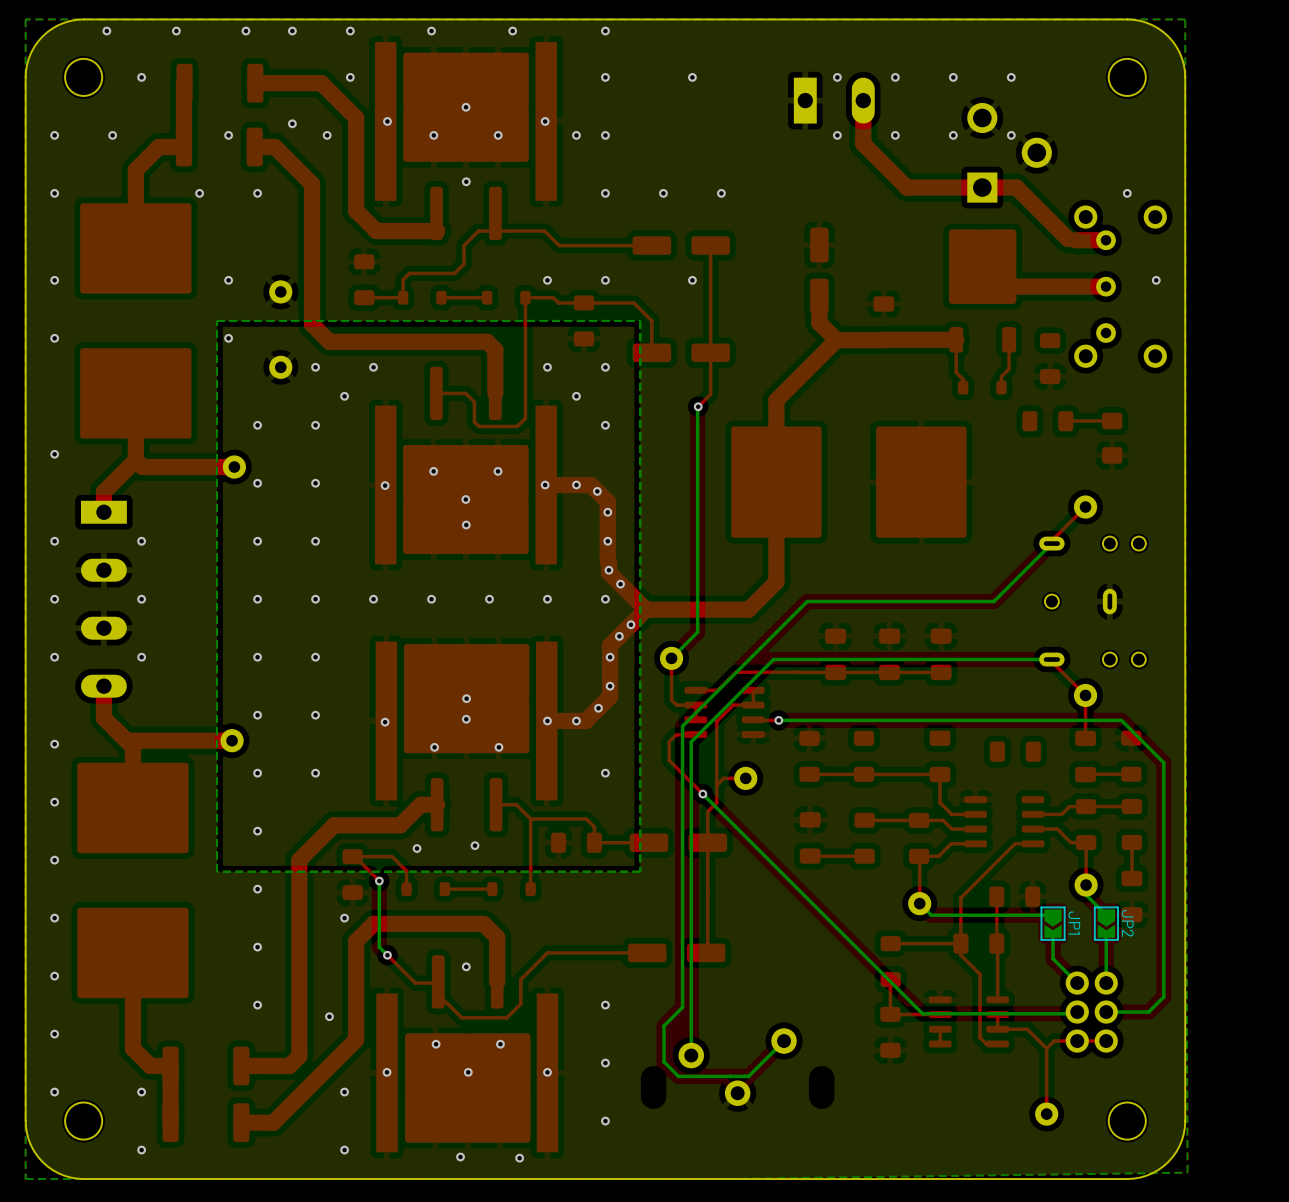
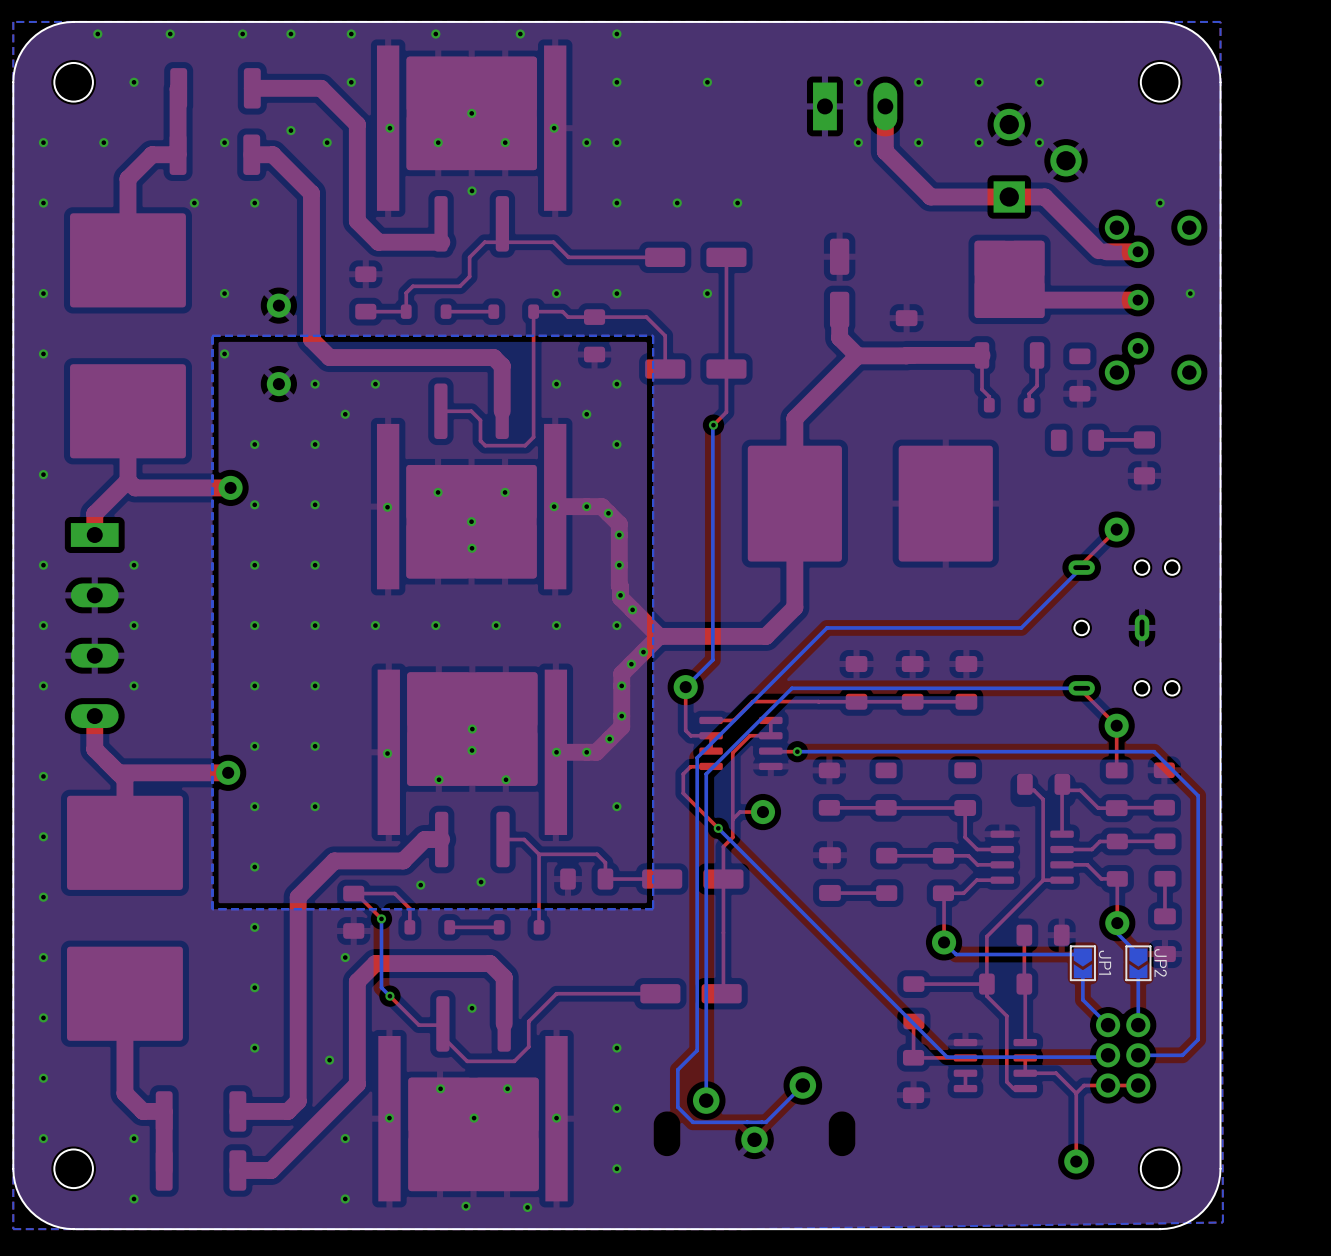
top track: none -> (1024, 790) (1033, 790) (1043, 799) (1043, 880)
top track: none -> (1116, 808) (1098, 808) (1080, 790) (1061, 790) (1062, 834)

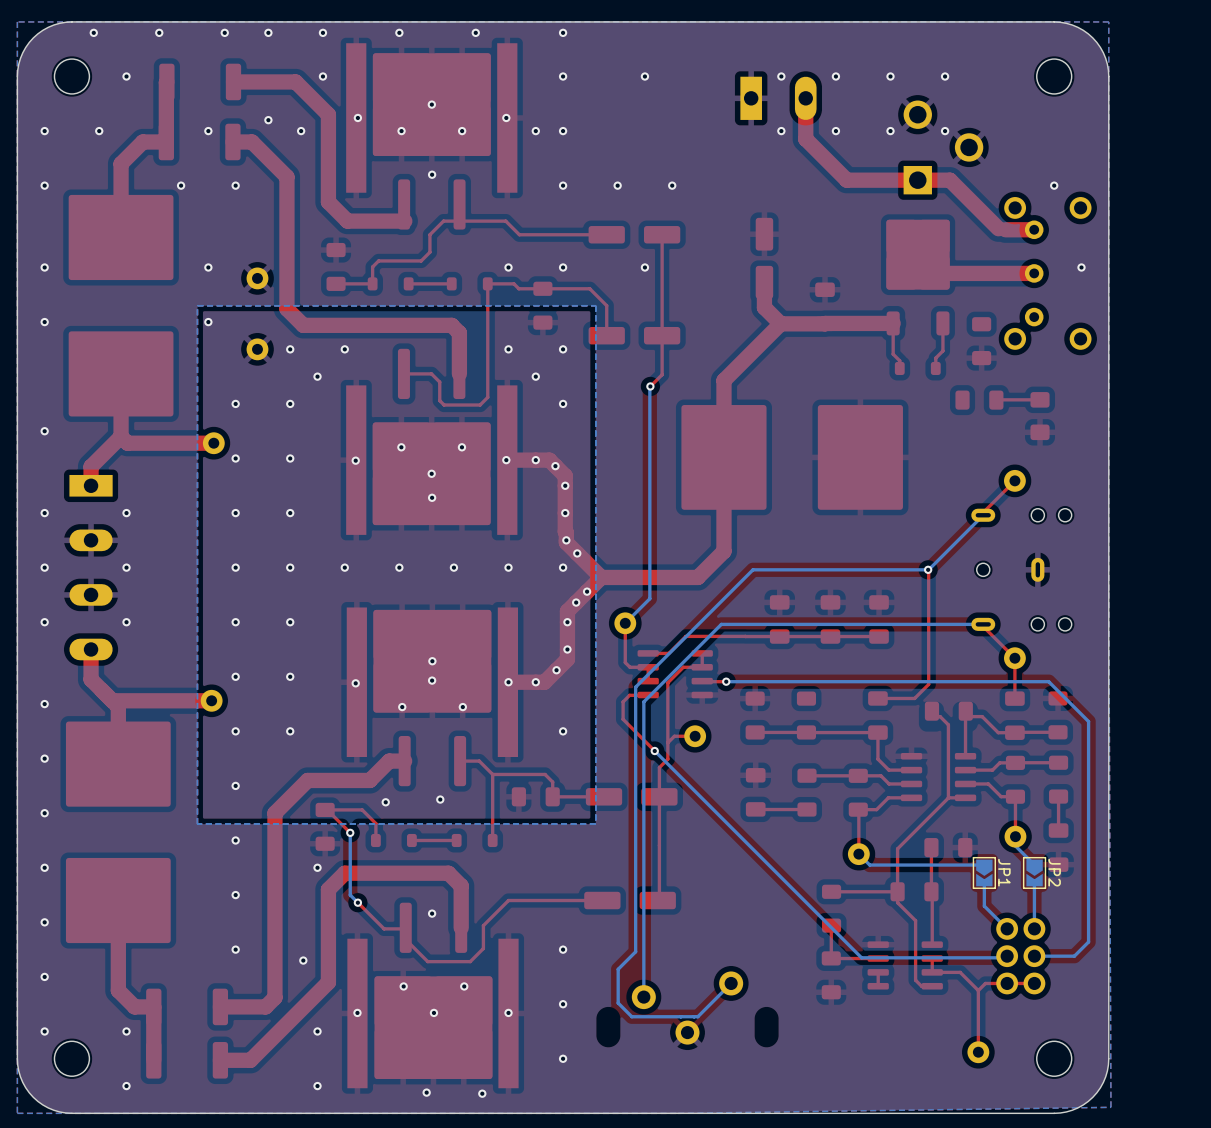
top track: none -> (928, 569) (928, 684) (914, 698) (877, 698)
via: none -> (928, 569)

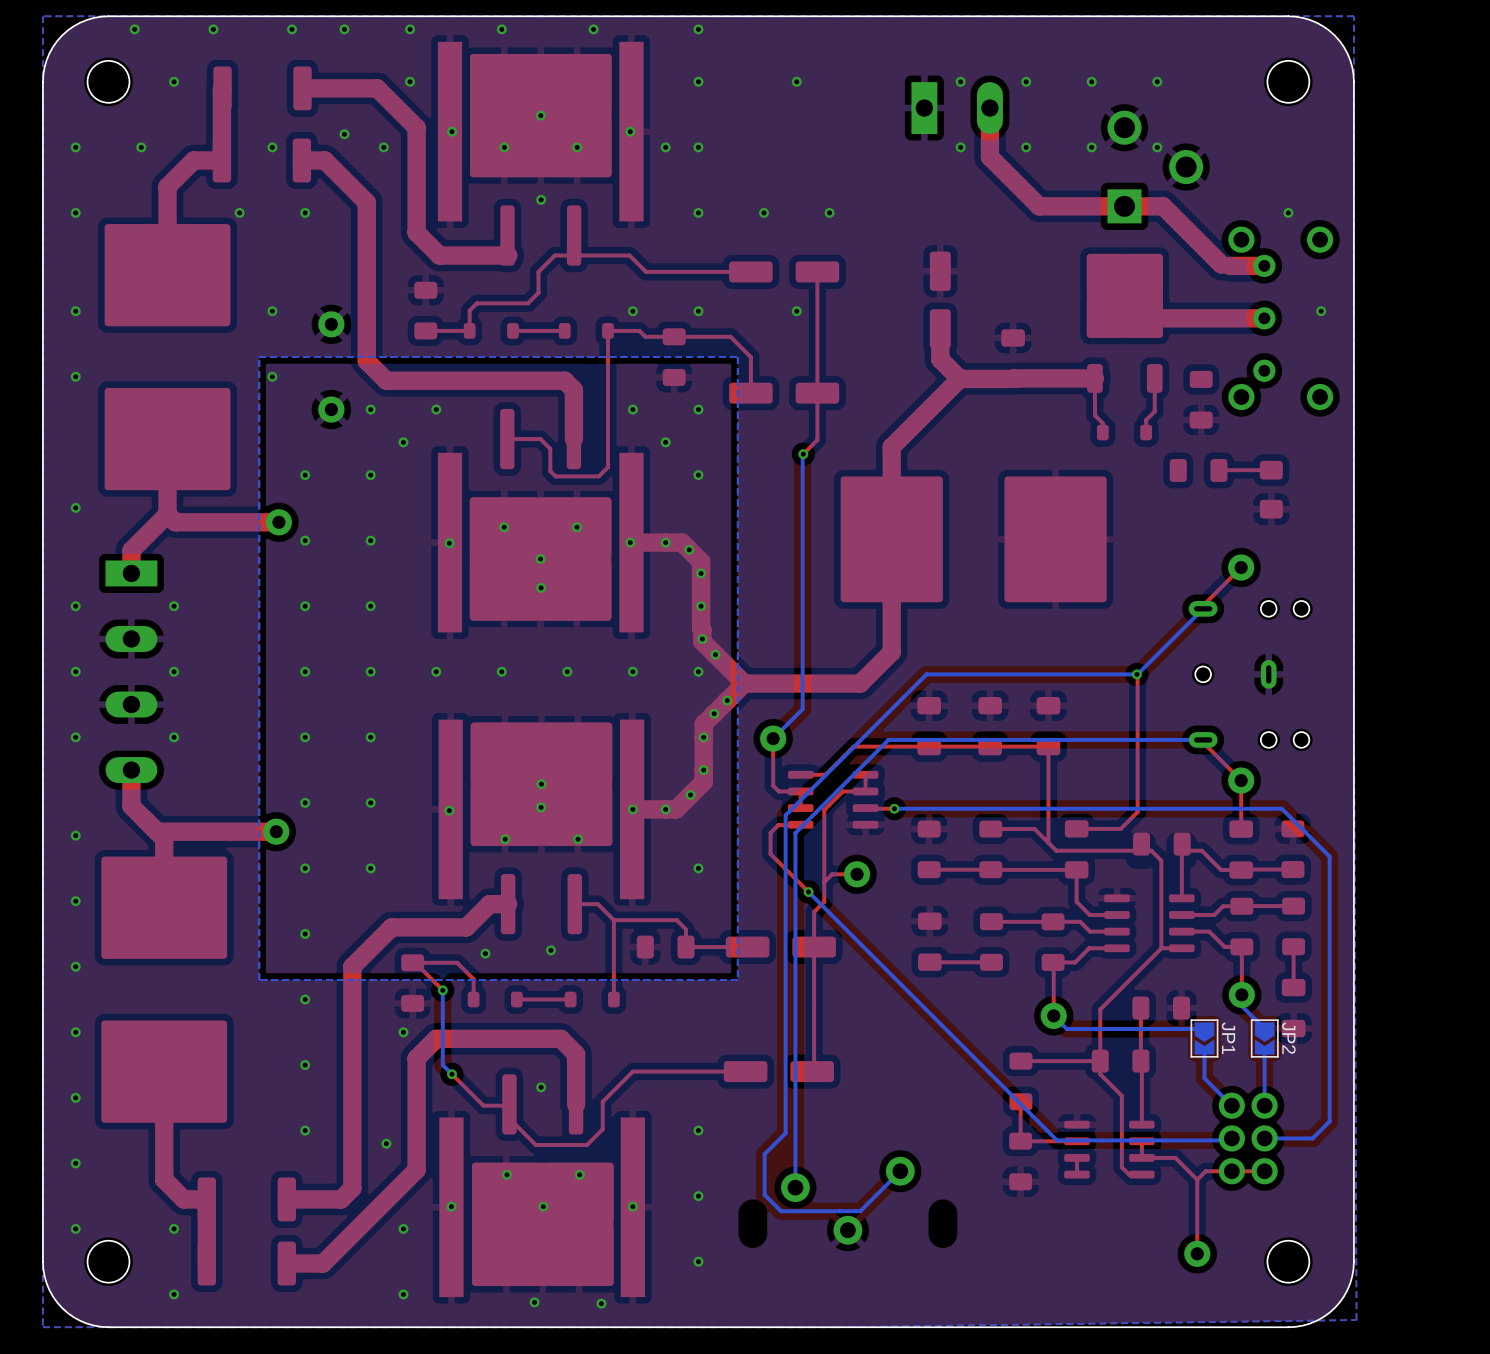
part: none -> (929, 726)
part: none -> (990, 726)
part: none -> (1048, 726)
part: (779, 619) -> none
part: (830, 619) -> none
part: (879, 619) -> none
top track: (745, 636) (685, 636) -> (1048, 842) (1048, 746) (853, 746) (845, 754)
top track: (879, 636) (745, 636) -> none
top track: none -> (990, 829) (1034, 829) (1056, 850) (1140, 850)

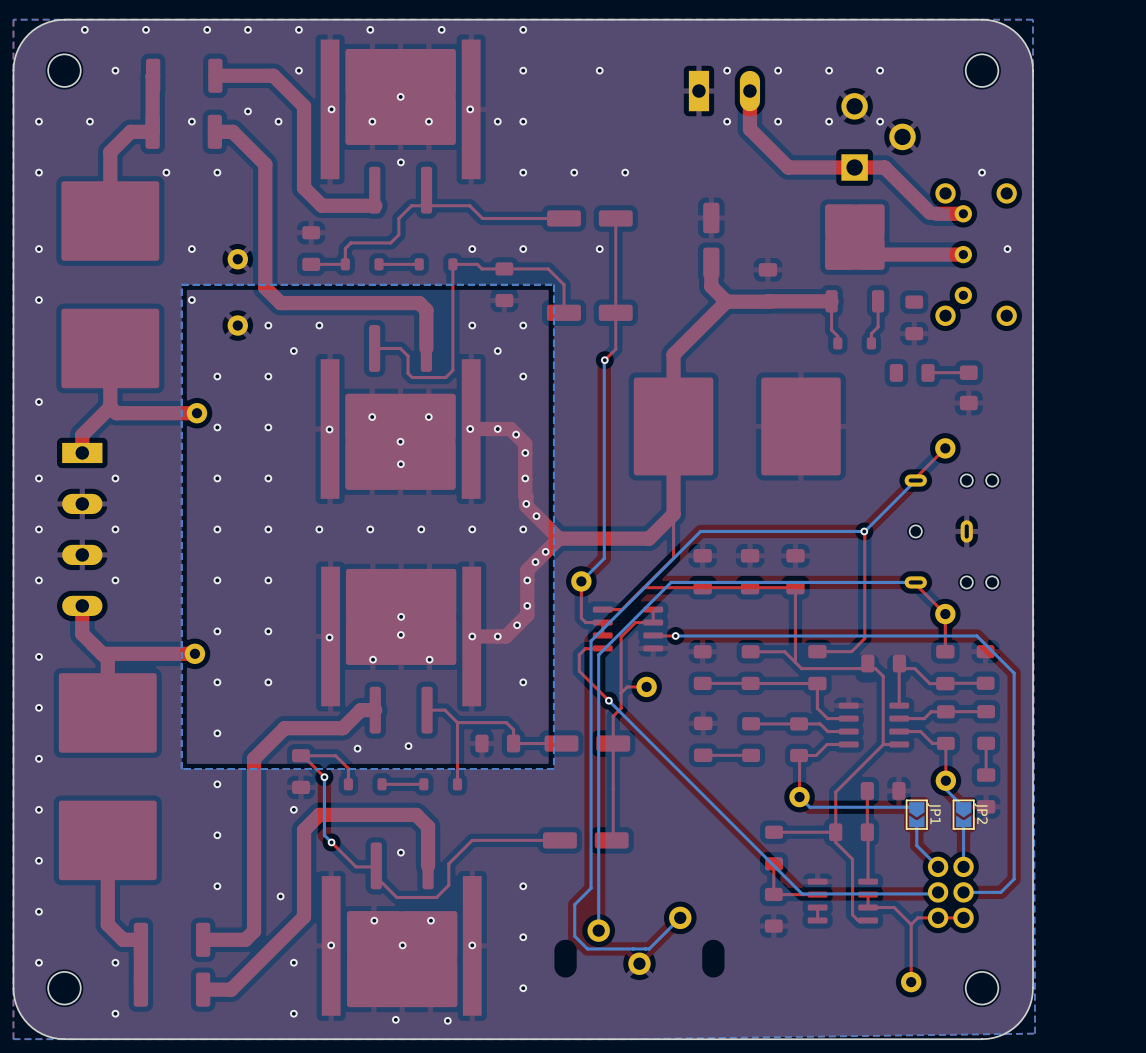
top track: none -> (673, 521) (673, 558) (643, 587)

